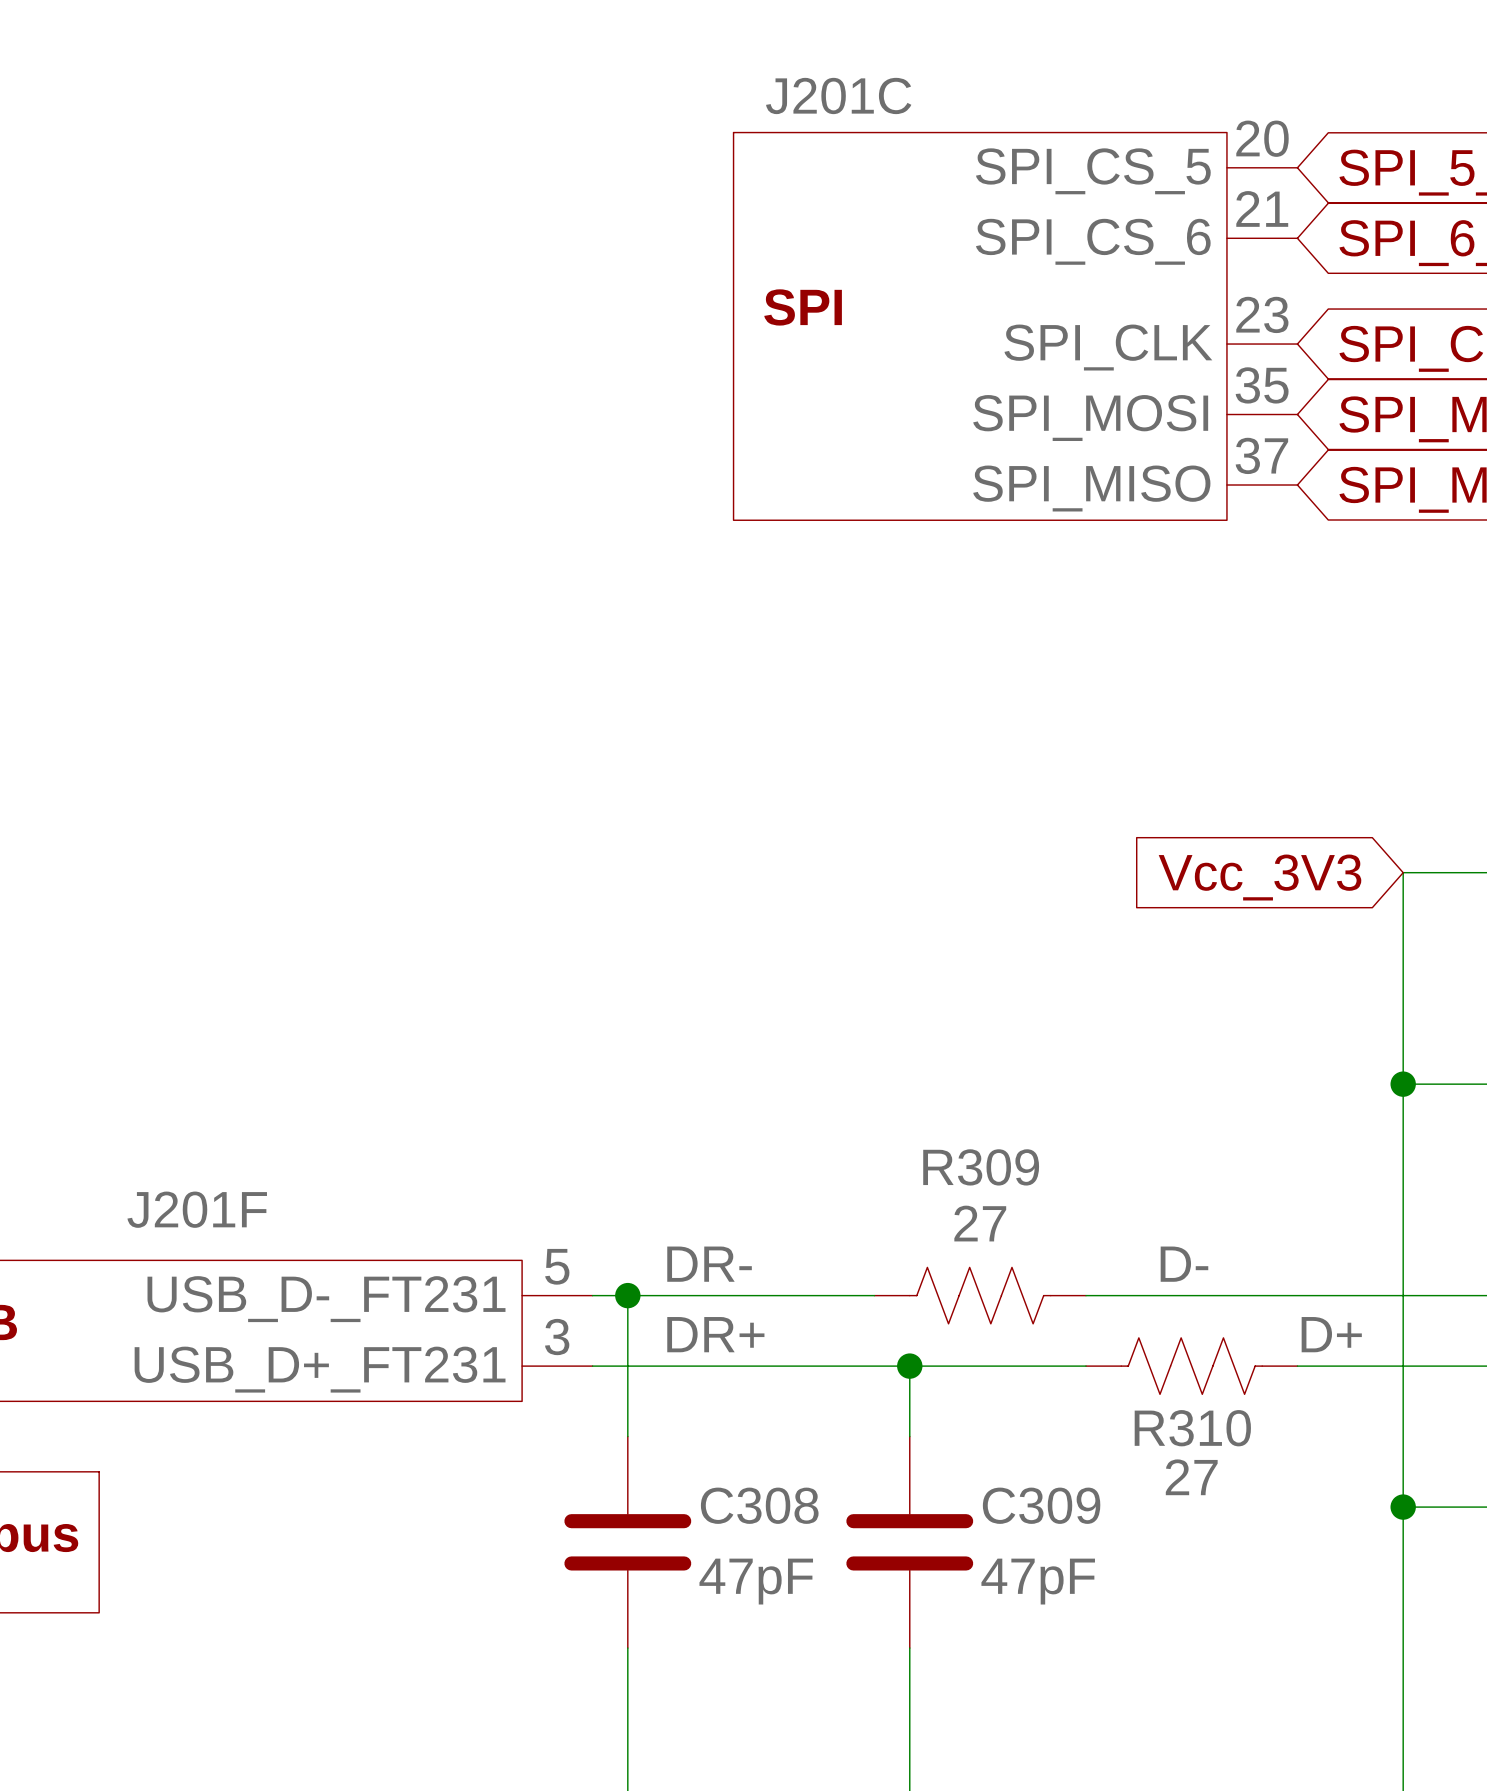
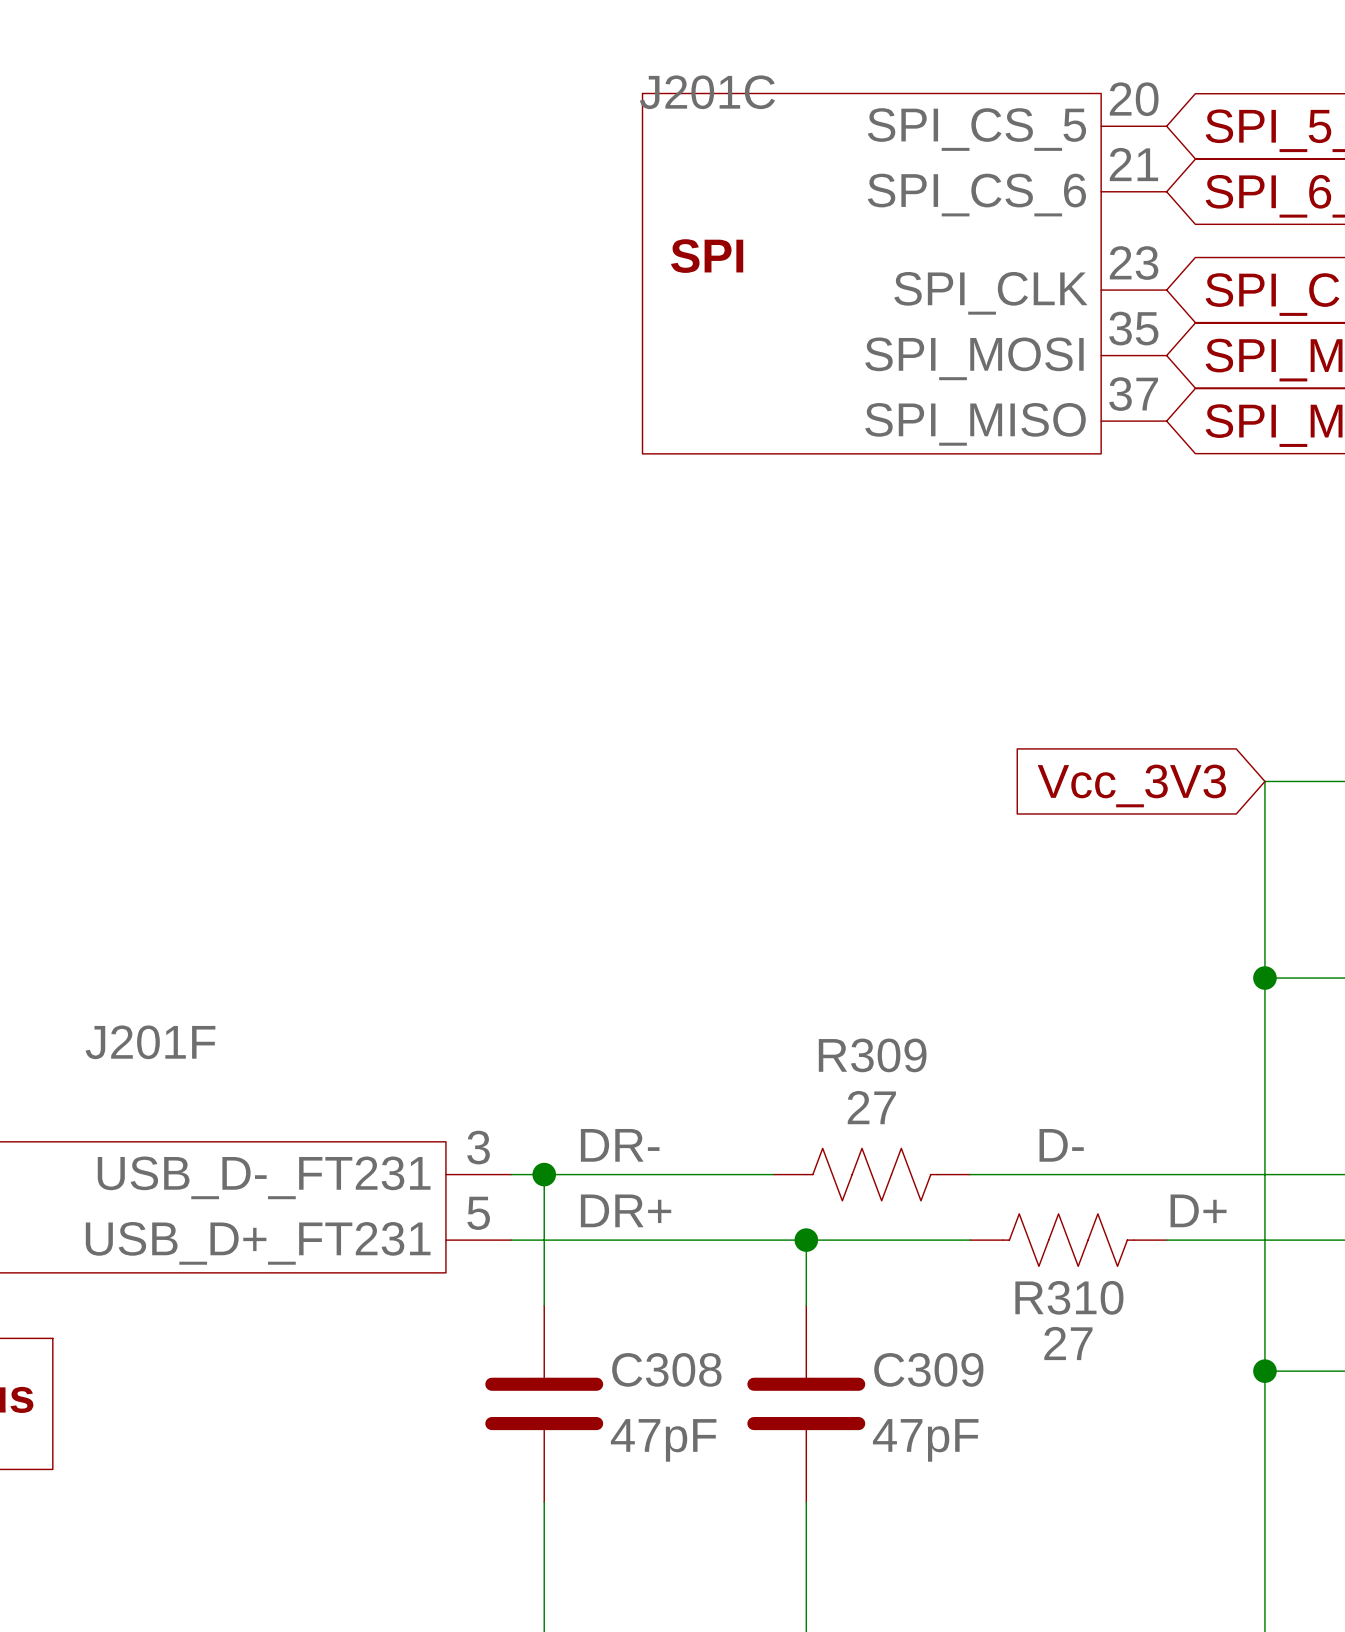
J201C name position: J201C (838, 95) -> J201C (707, 92)
J201F name position: J201F (197, 1209) -> J201F (150, 1042)
J201F pin number: 5 (557, 1266) -> 3 (478, 1147)
J201F pin number: 3 (557, 1337) -> 5 (478, 1213)

